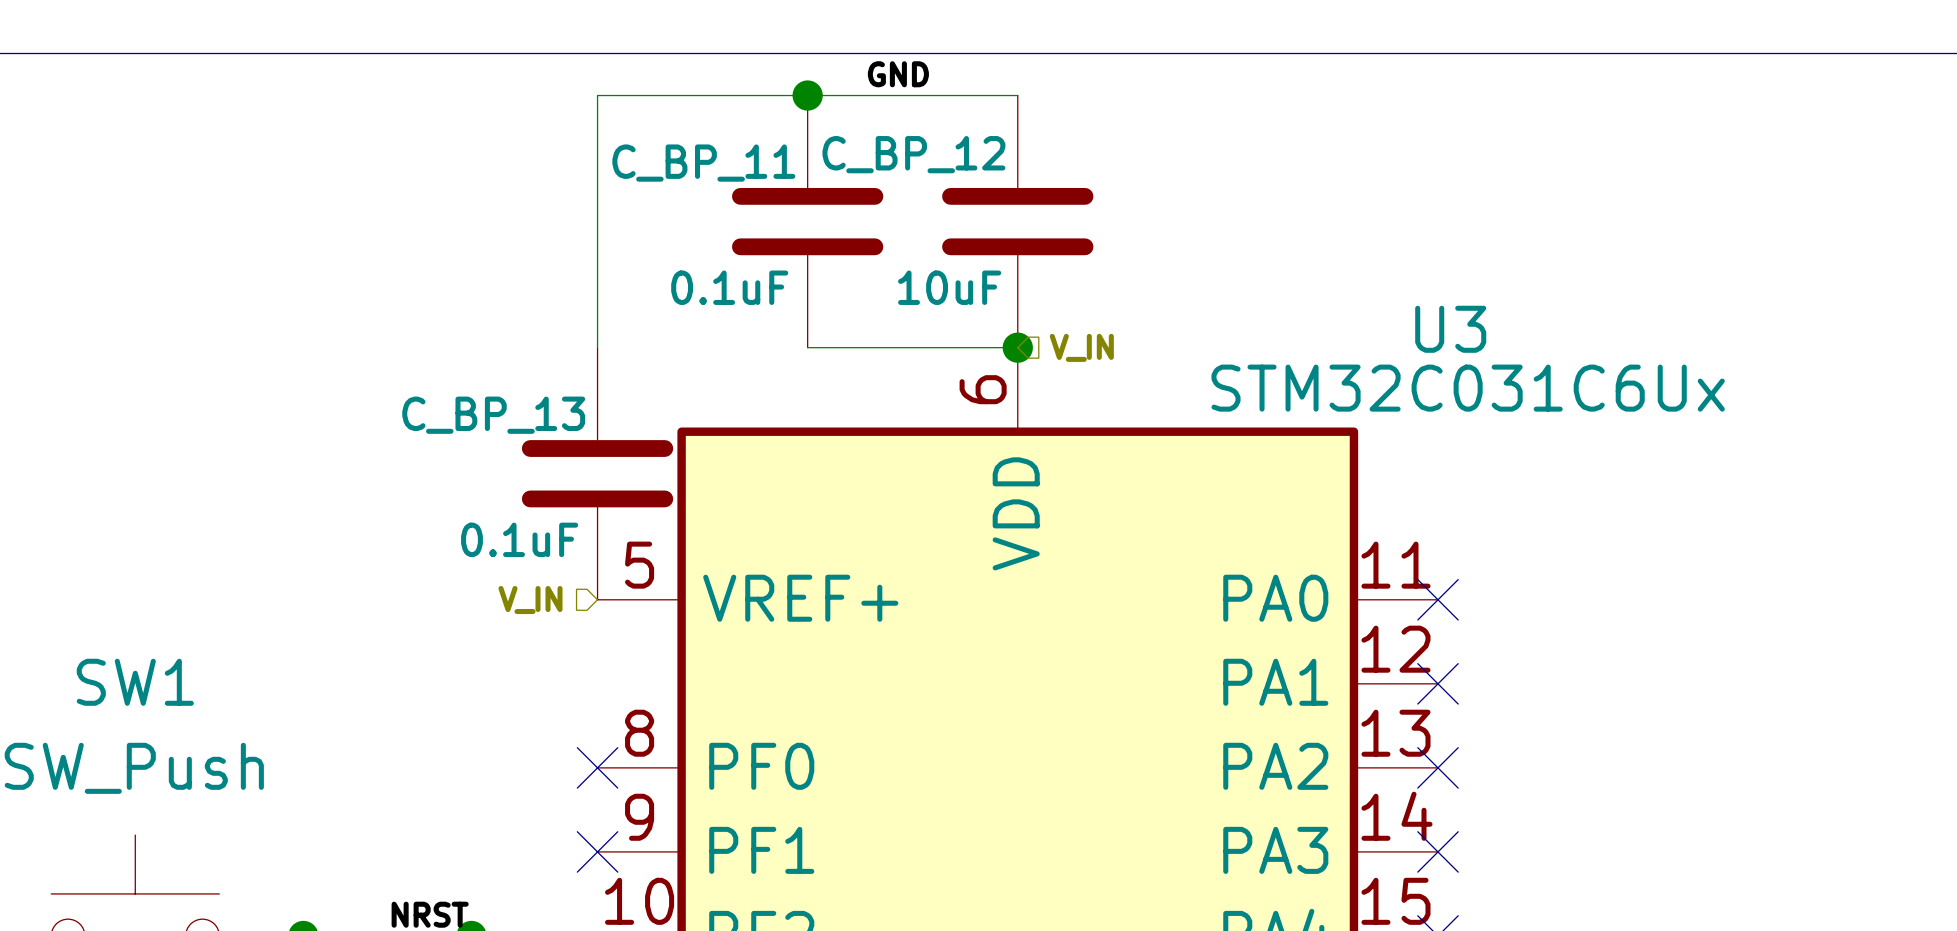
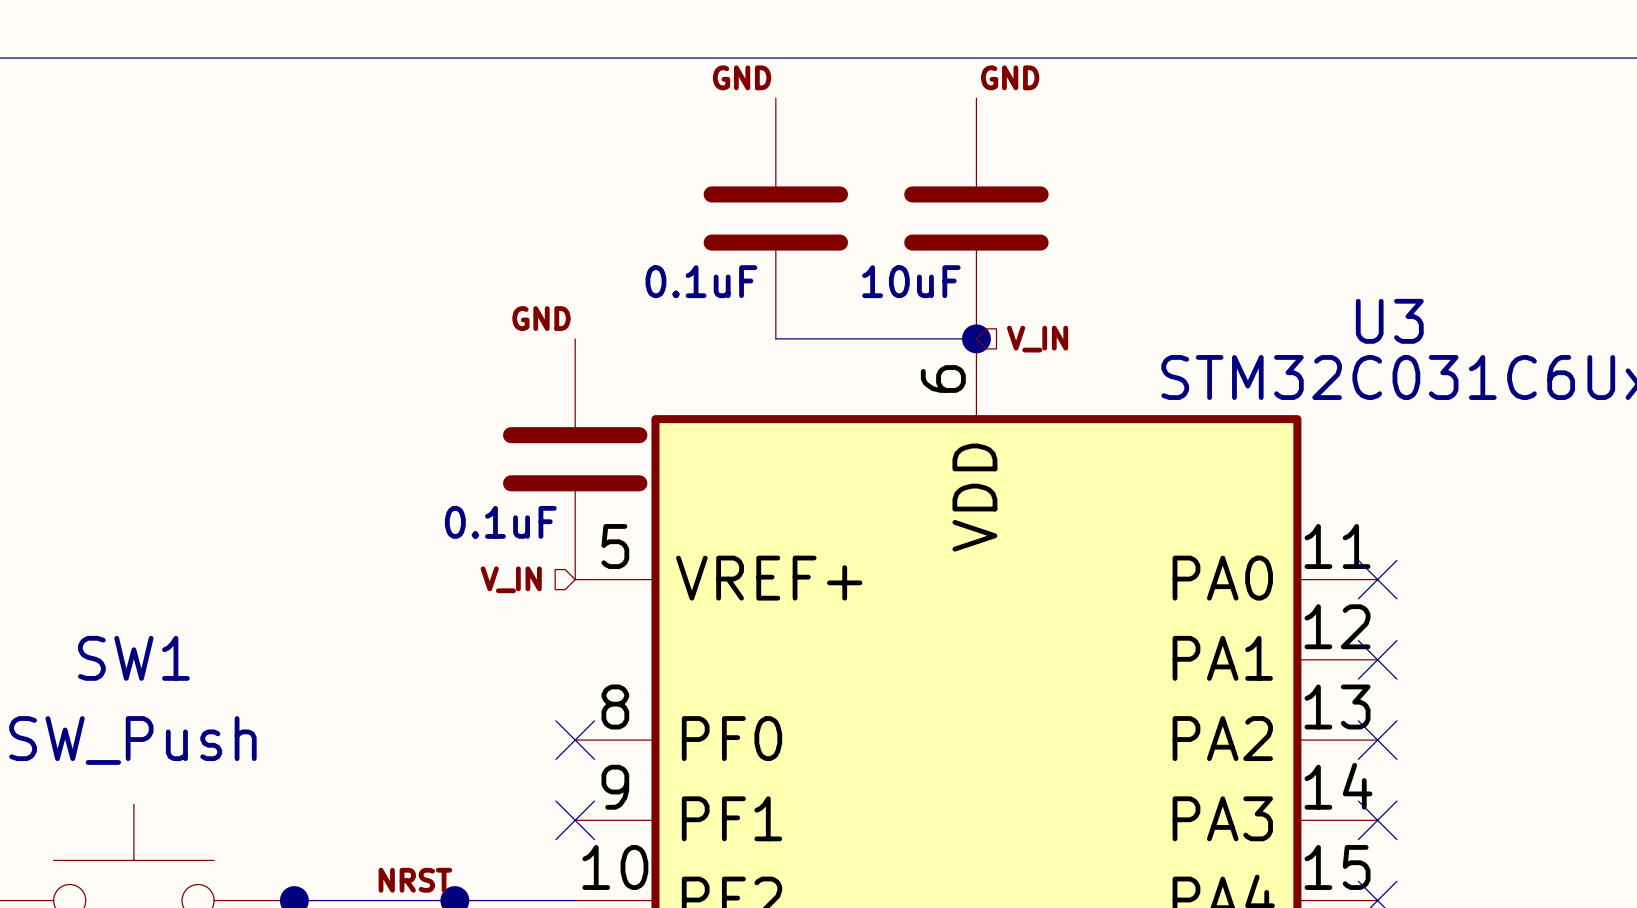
label: none -> GND (742, 77)
label: GND (898, 74) -> none
label: none -> GND (1010, 77)
junction: (807, 95) -> none
wire: (1017, 95) (597, 95) (597, 347) -> none
C_BP_12 name: C_BP_12 (913, 154) -> none
C_BP_11 name: C_BP_11 (703, 163) -> none
label: none -> GND (541, 318)
C_BP_13 name: C_BP_13 (493, 415) -> none

